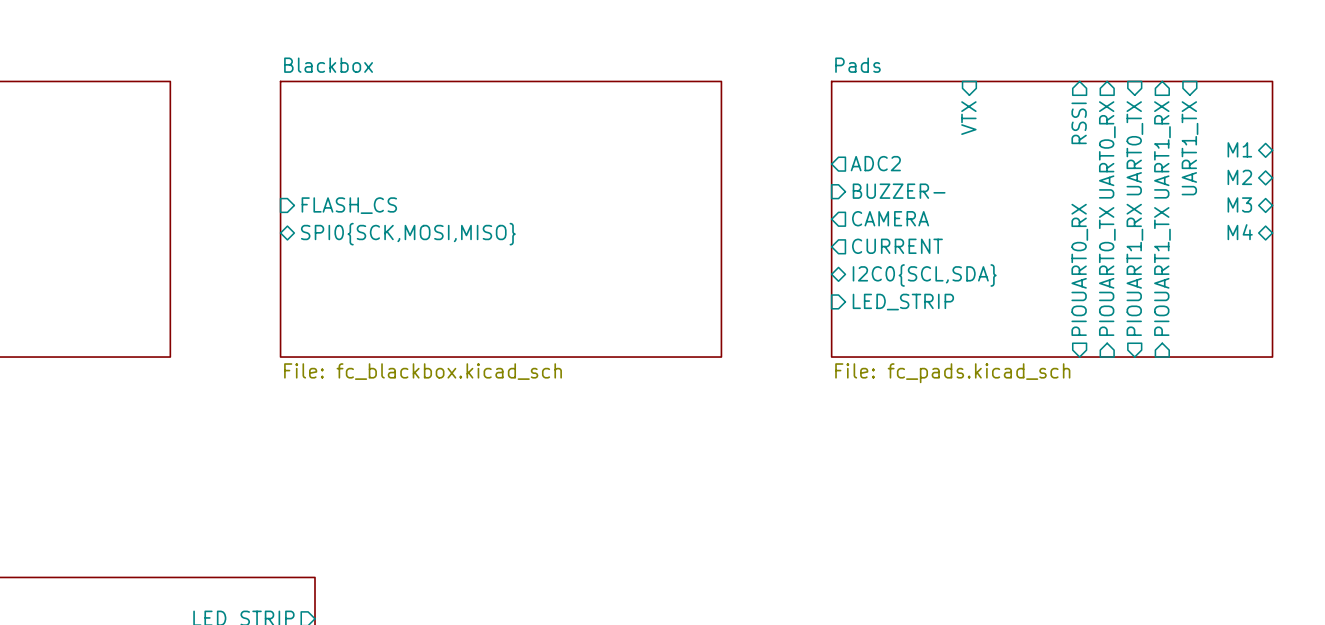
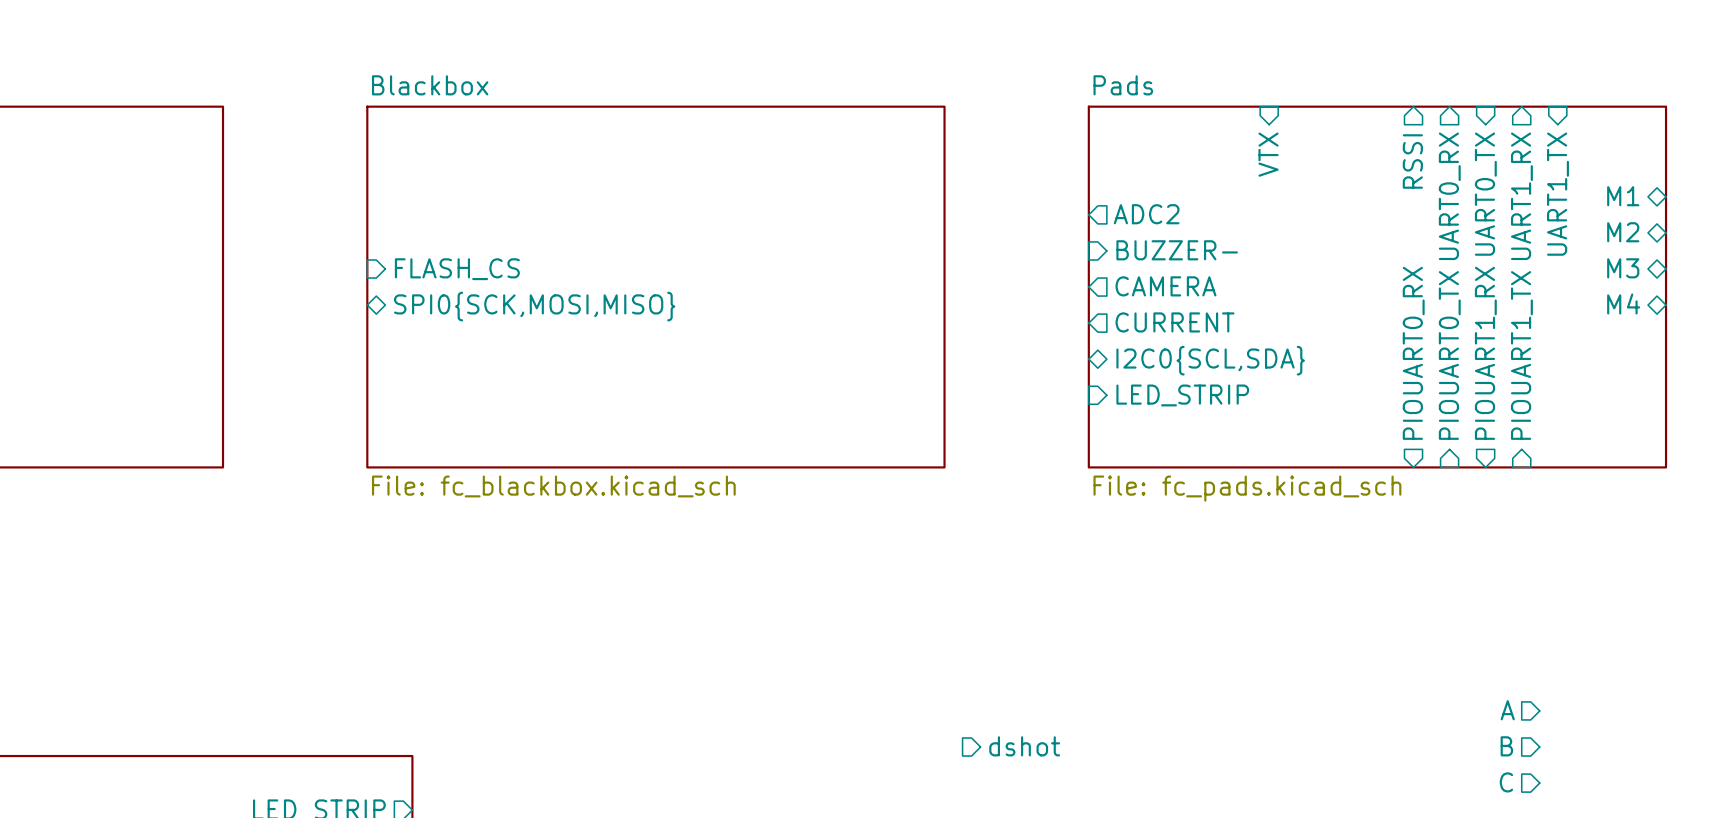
sheet pin: none -> A (1507, 710)
sheet pin: none -> dshot (1024, 746)
sheet pin: none -> B (1506, 746)
sheet pin: none -> C (1506, 782)

